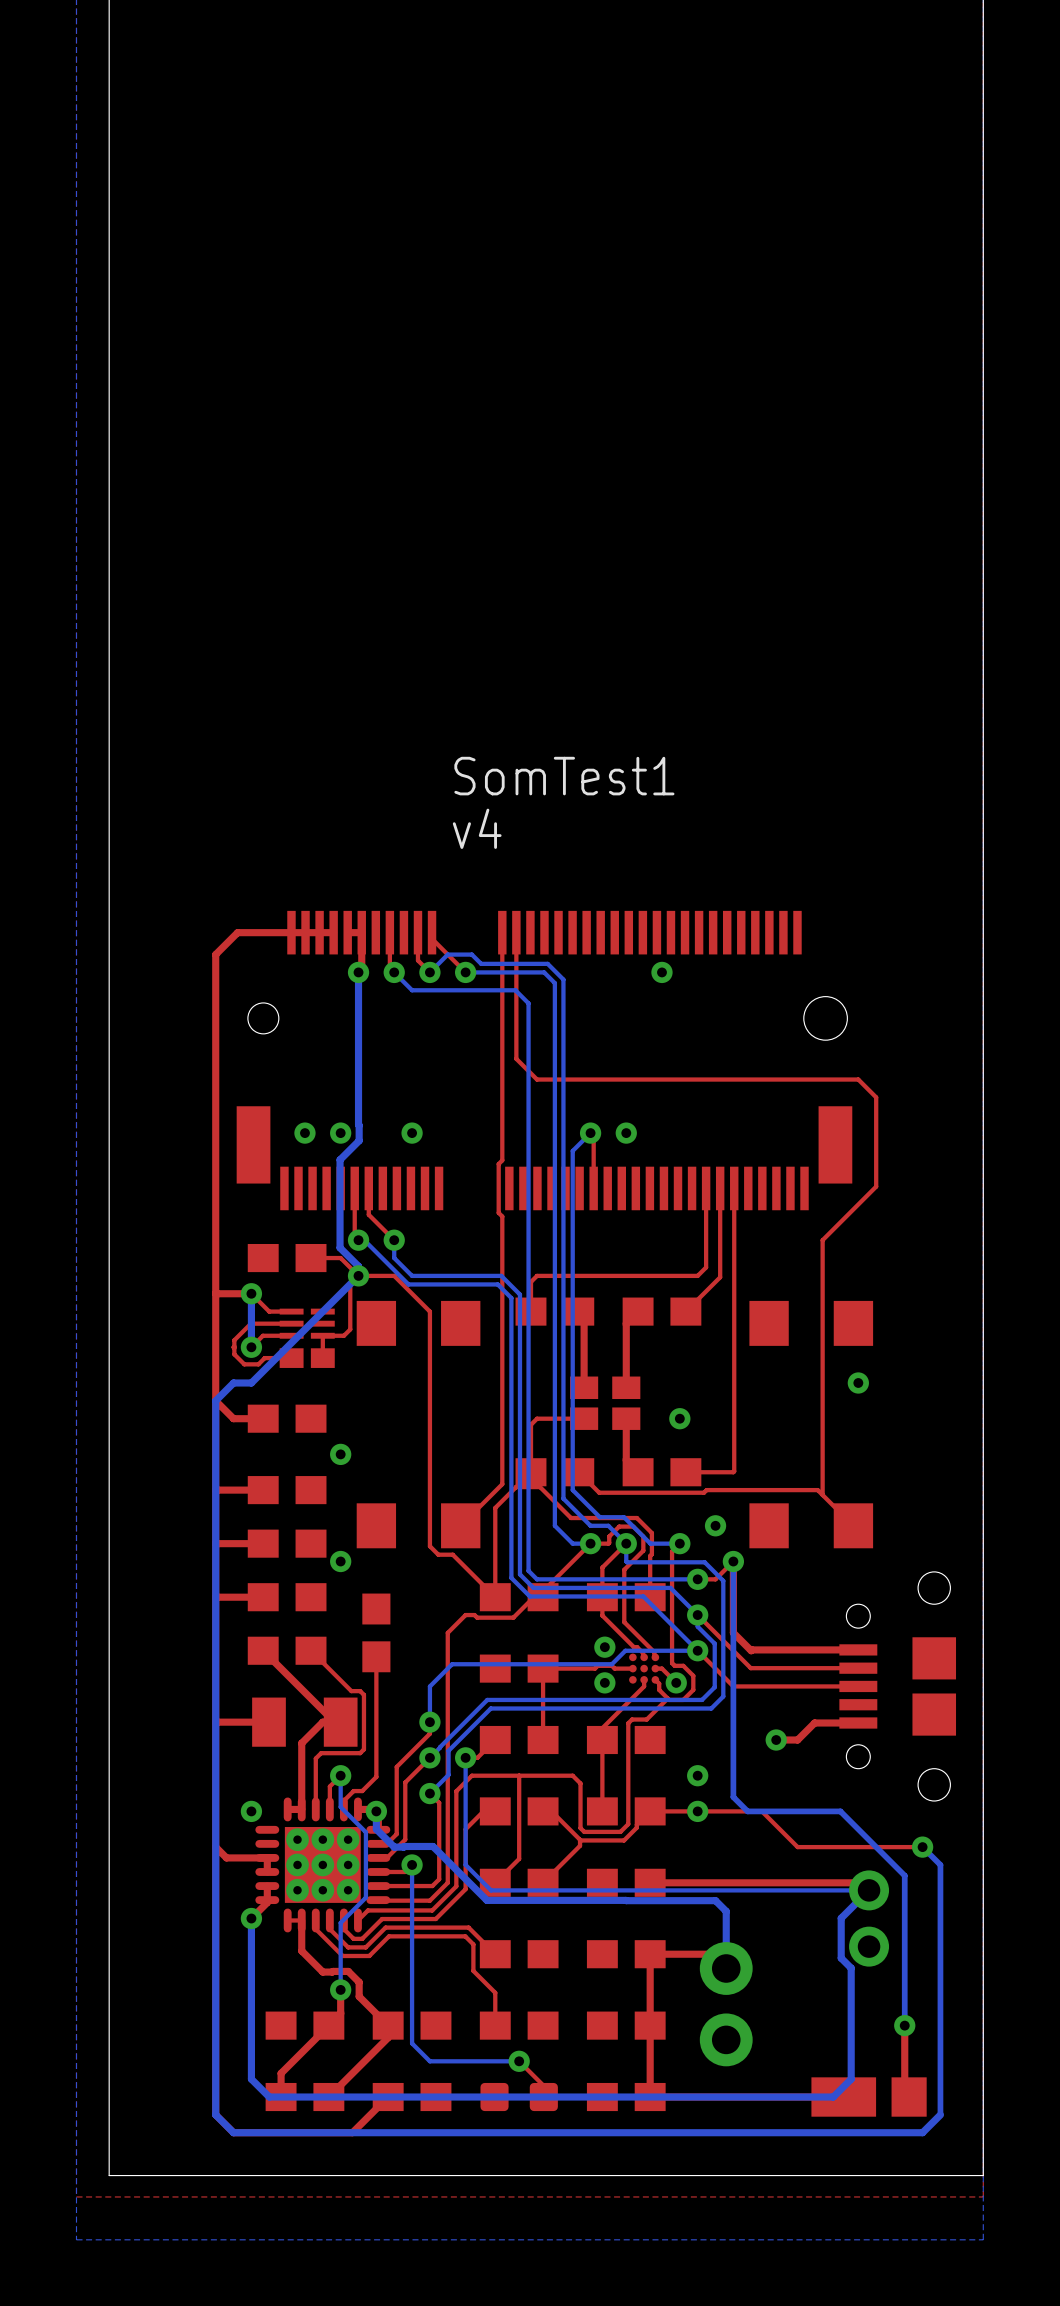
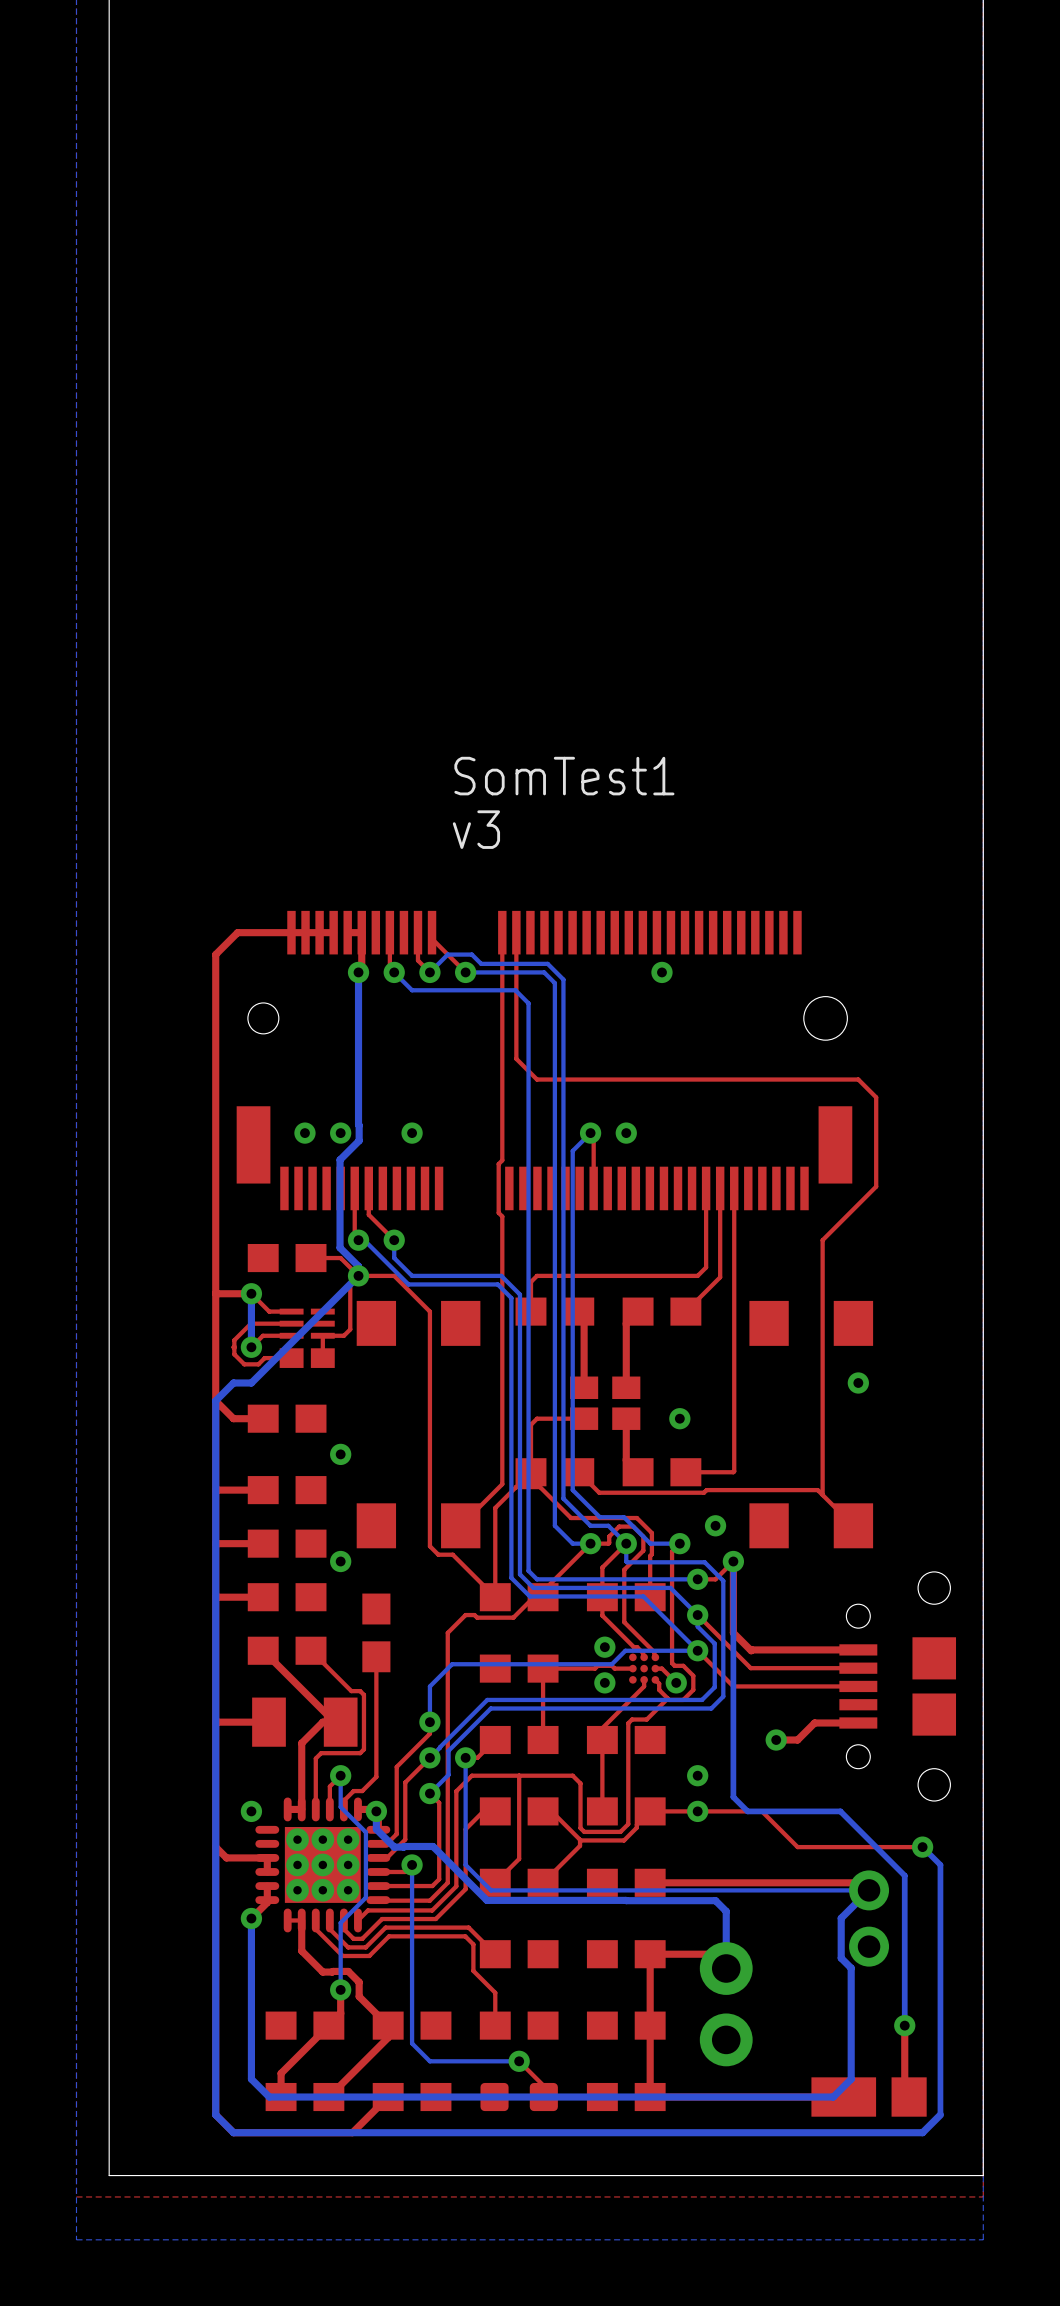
text: v4 (477, 828) -> v3 (476, 829)

